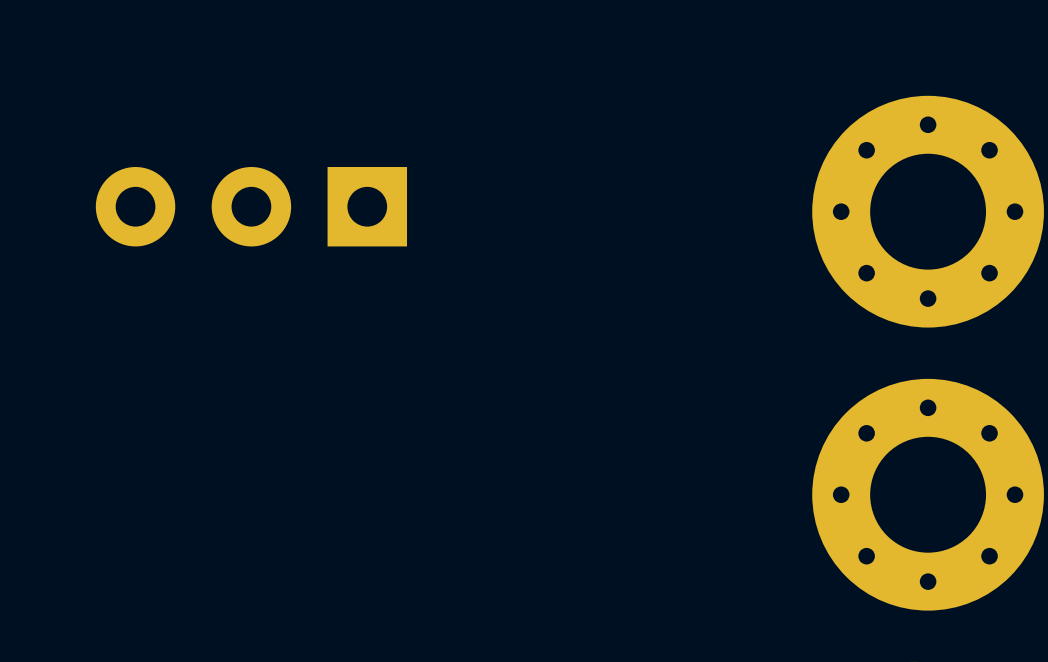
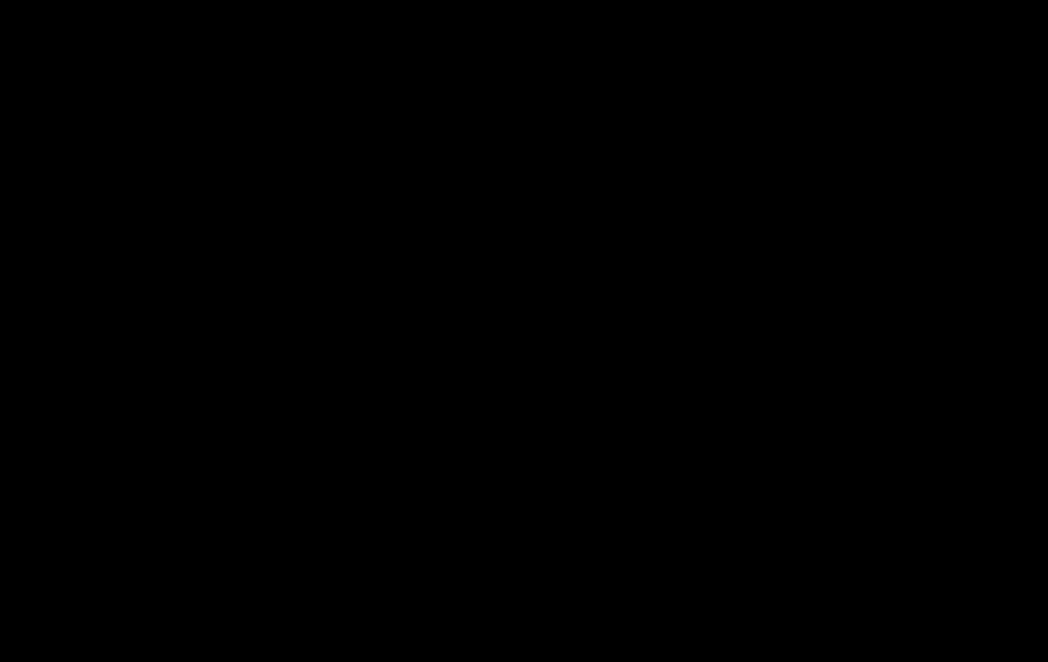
part: (251, 206) -> none
part: (928, 211) -> none
part: (928, 494) -> none

